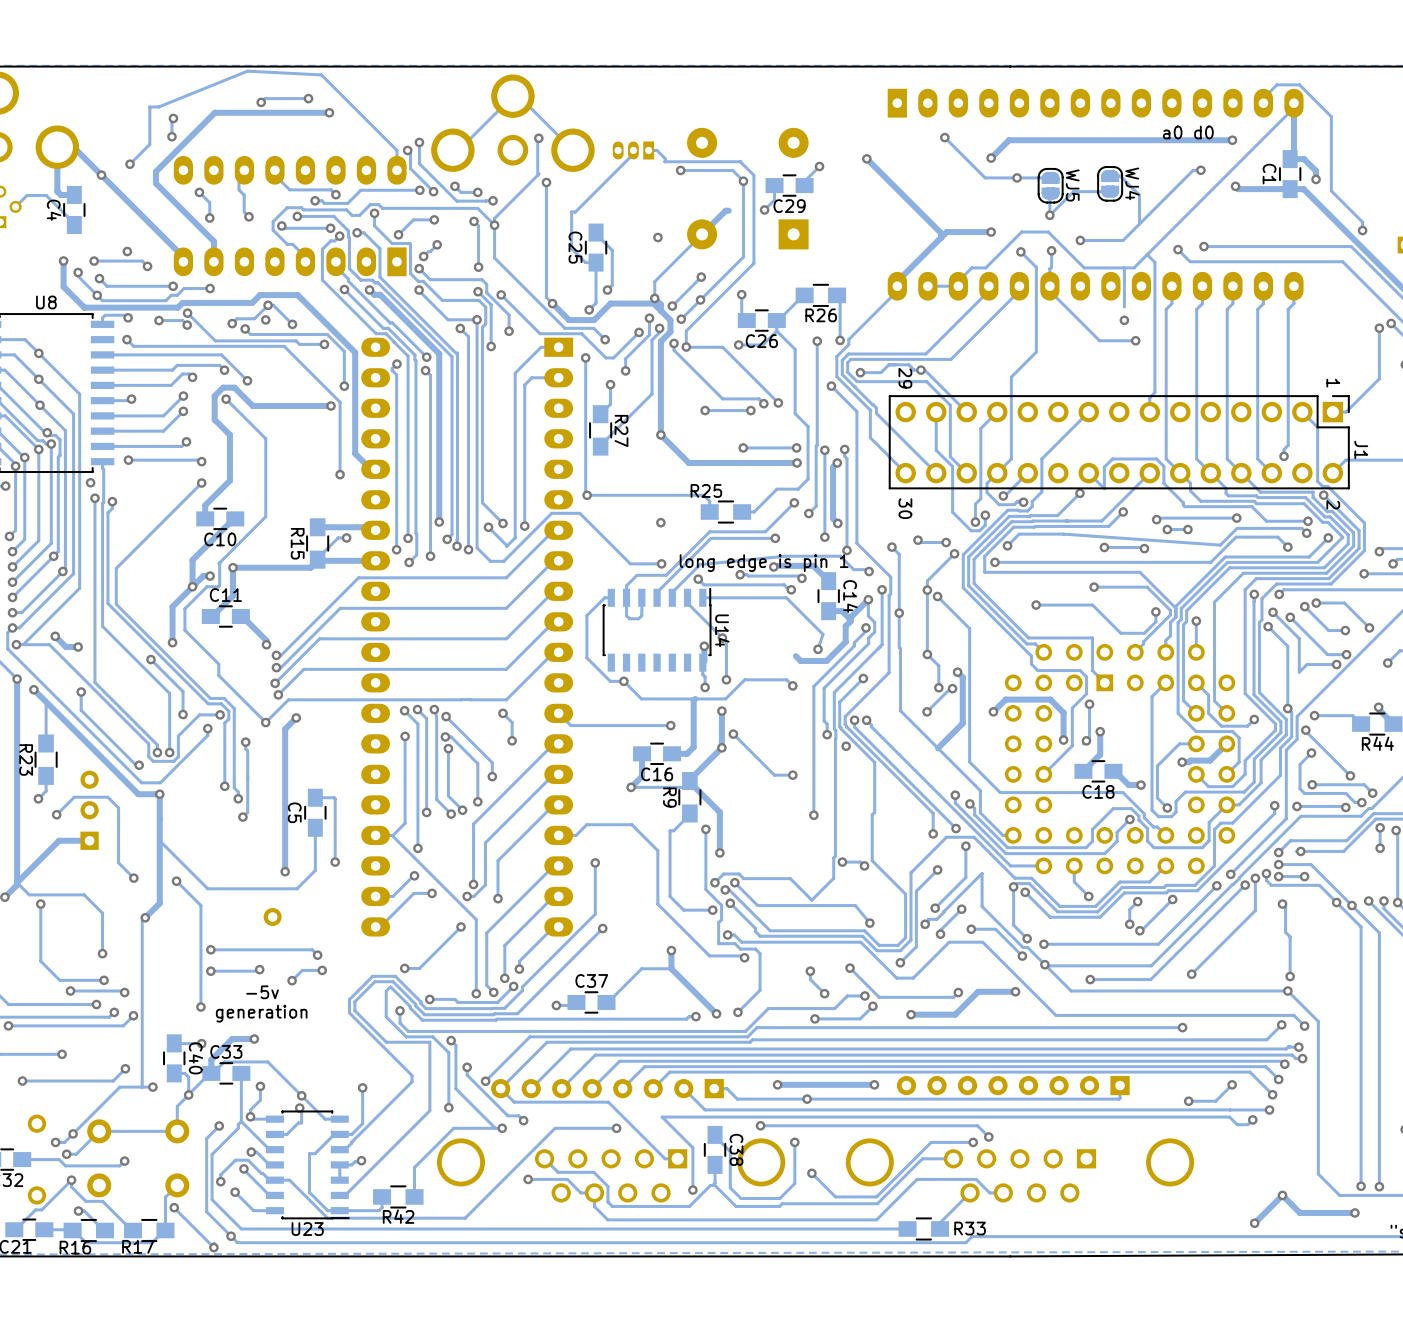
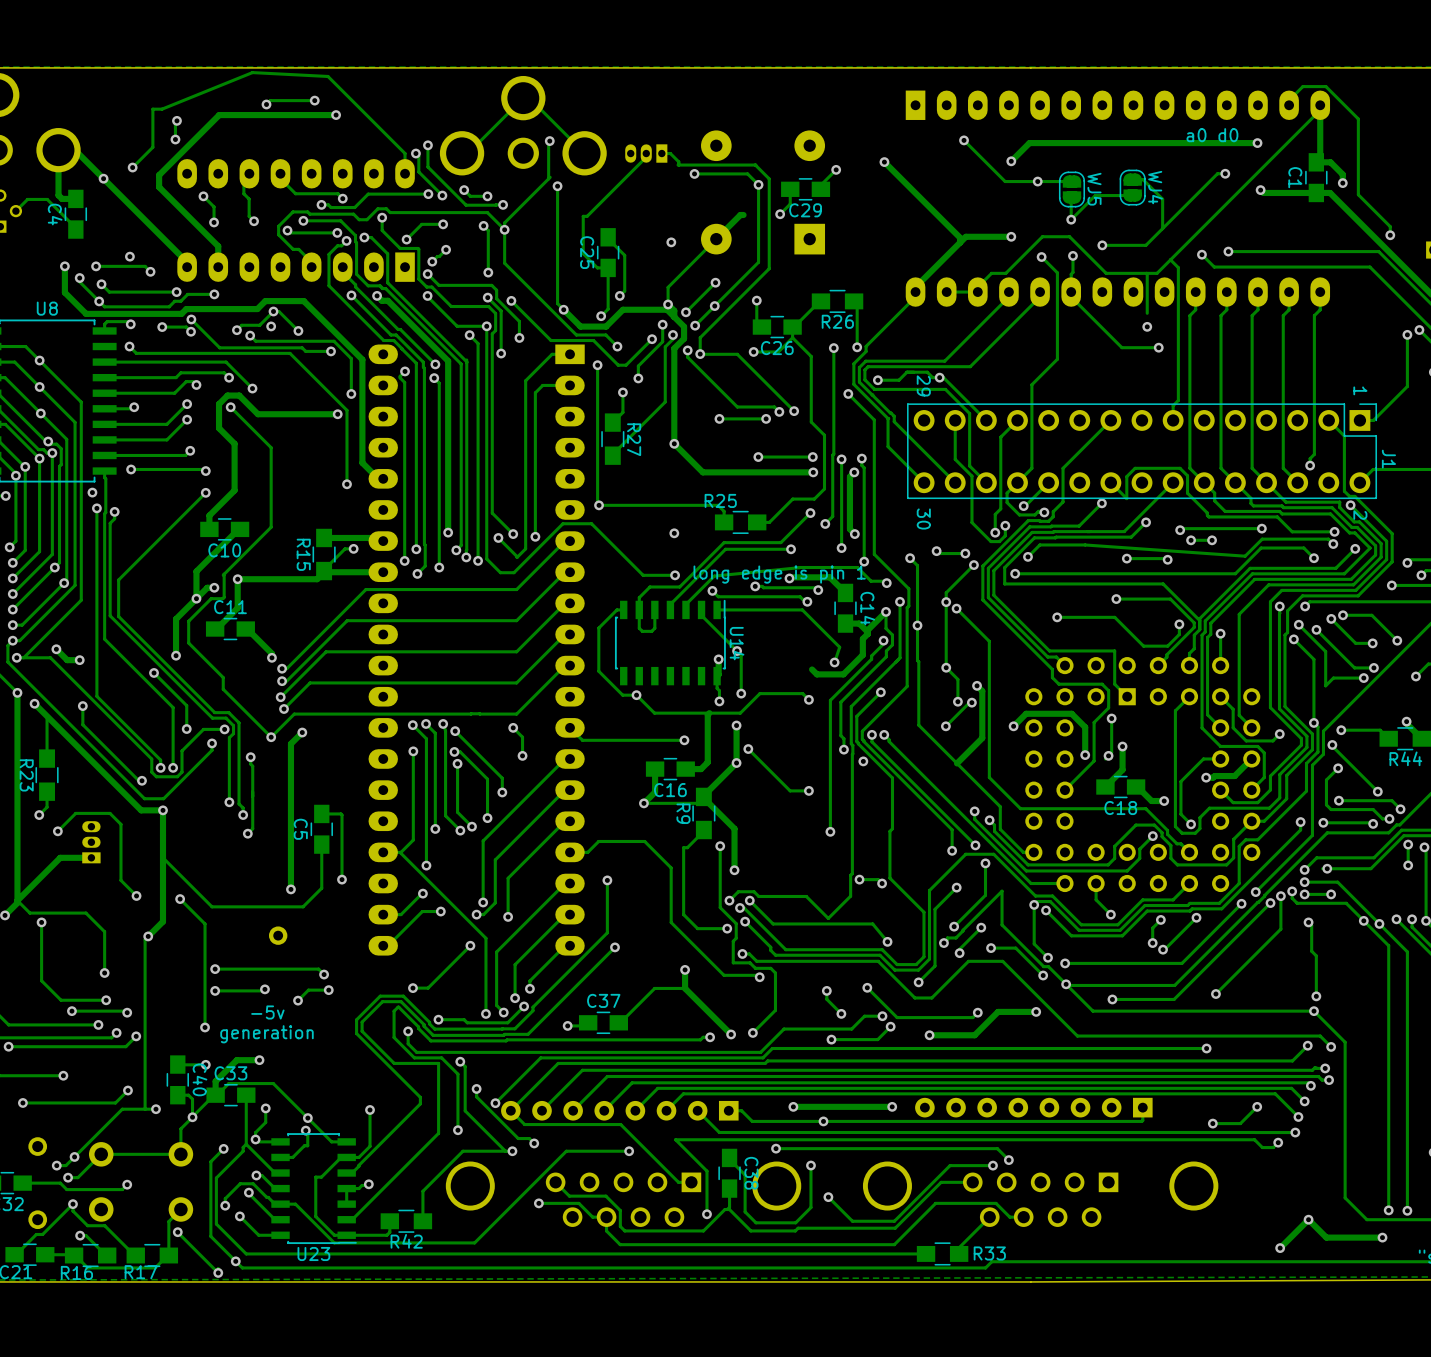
part: (89, 810) -> none
part: none -> (91, 842)

